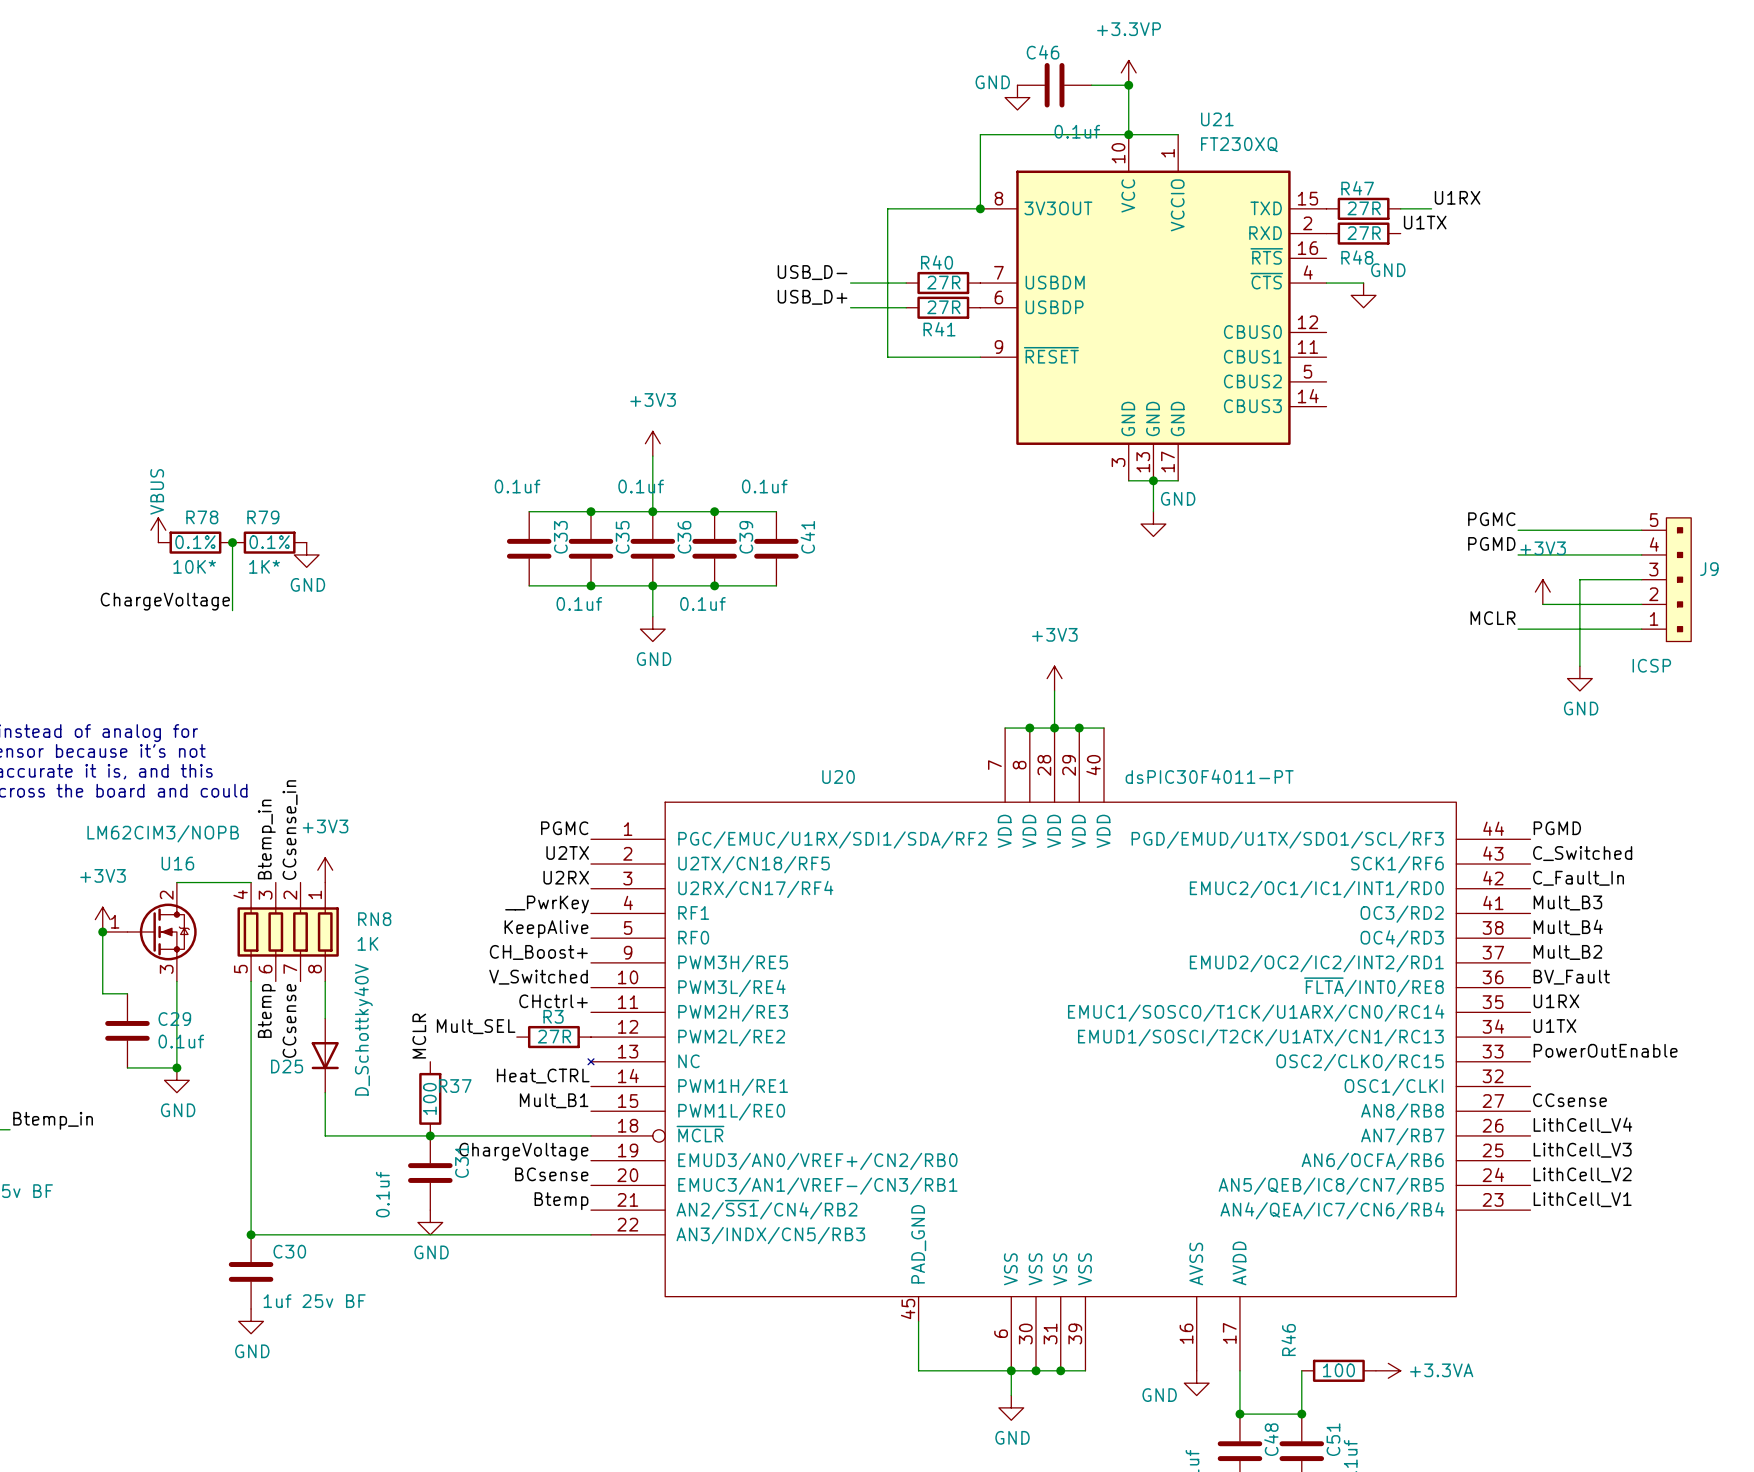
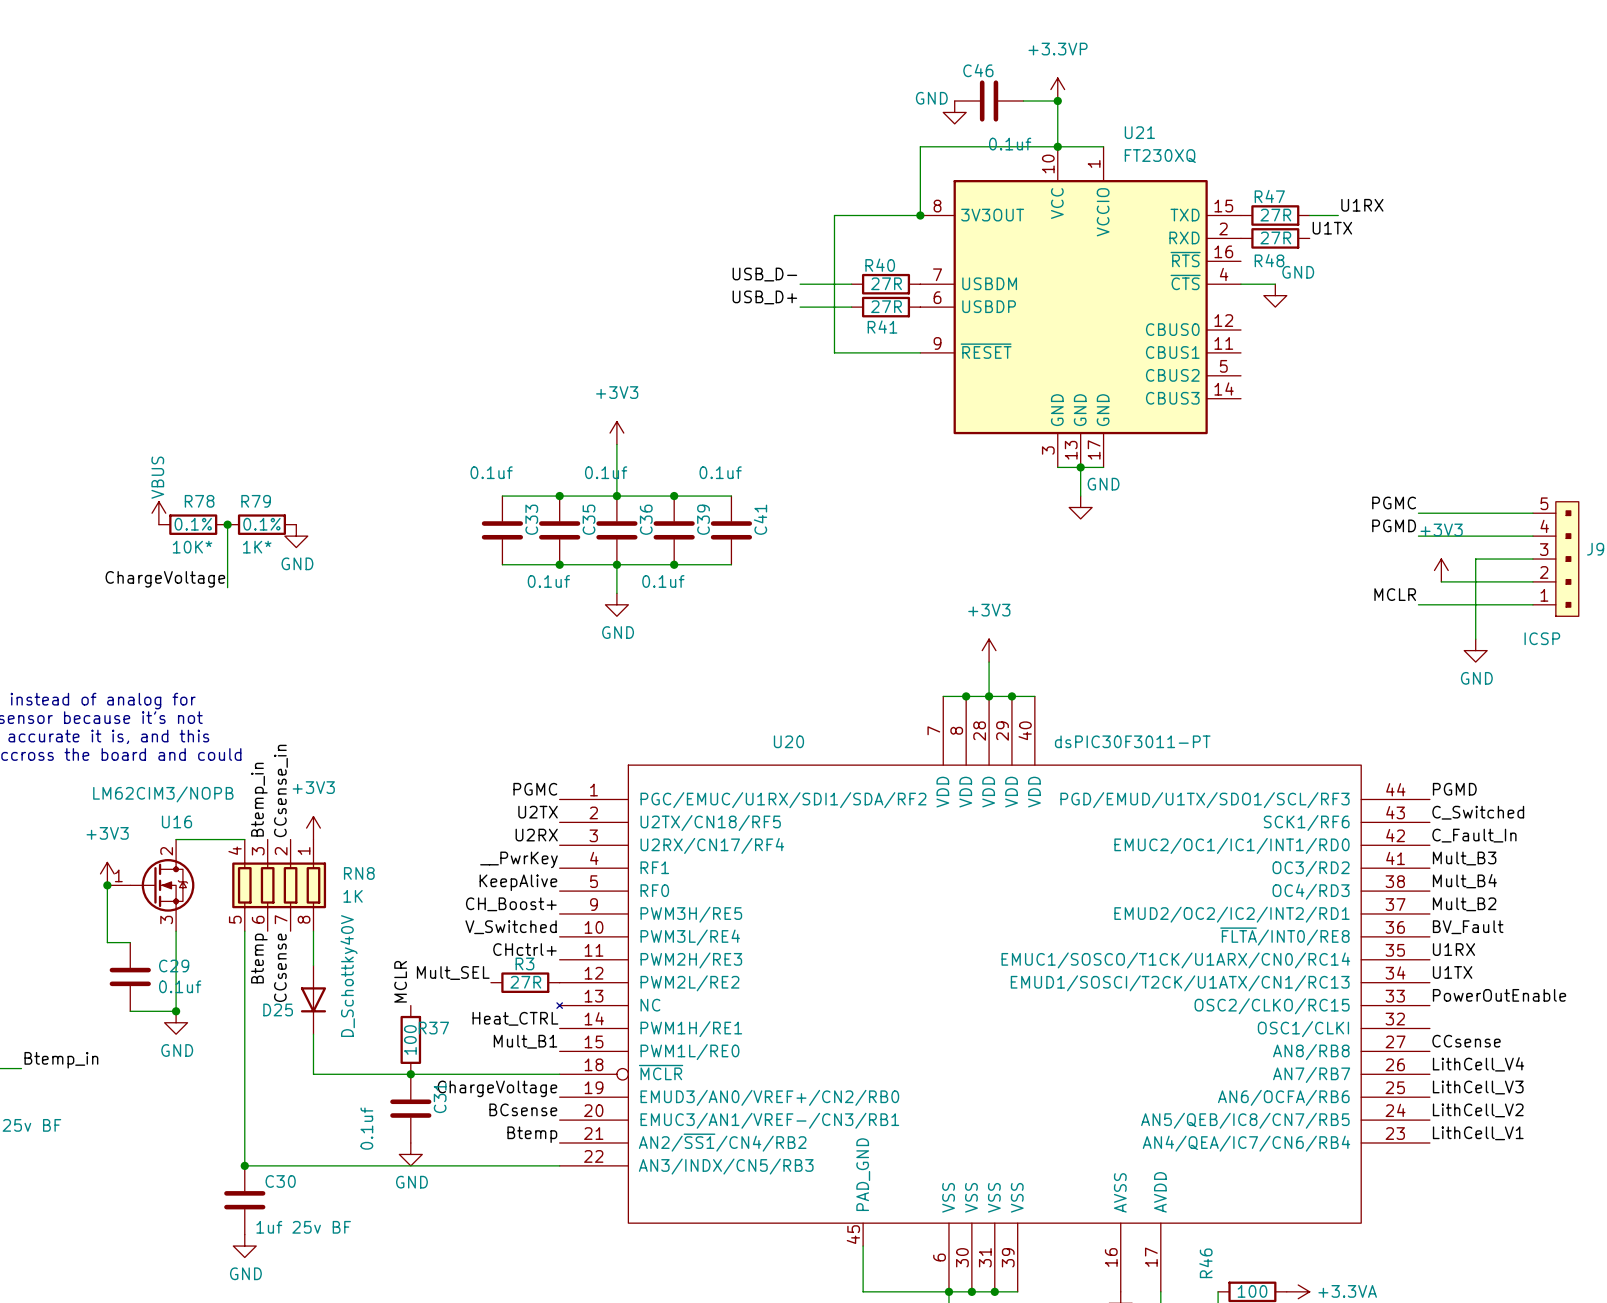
U20 value: dsPIC30F4011-PT (1209, 776) -> dsPIC30F3011-PT (1132, 741)

